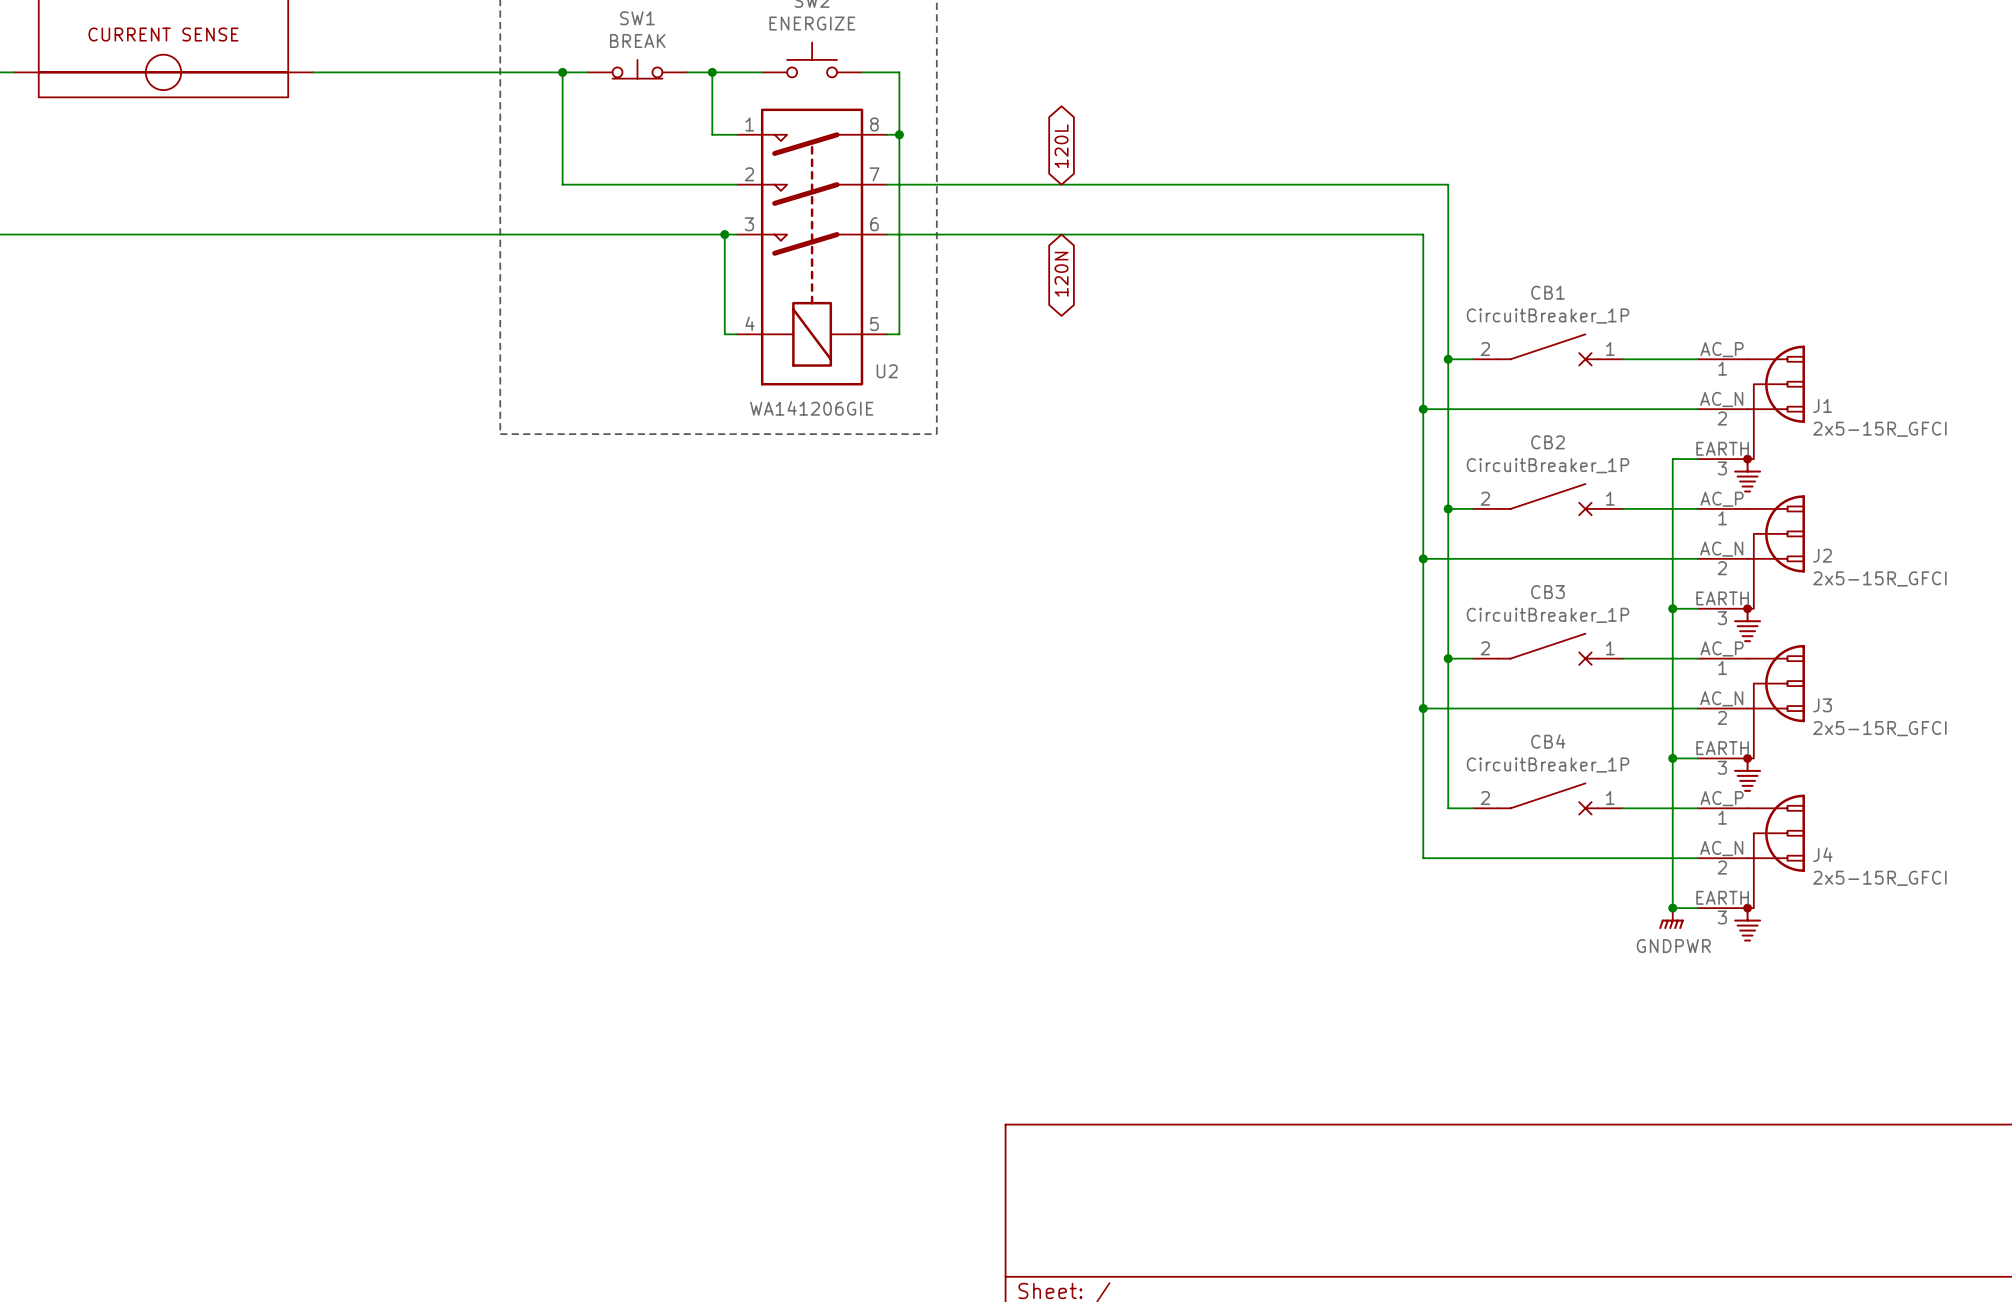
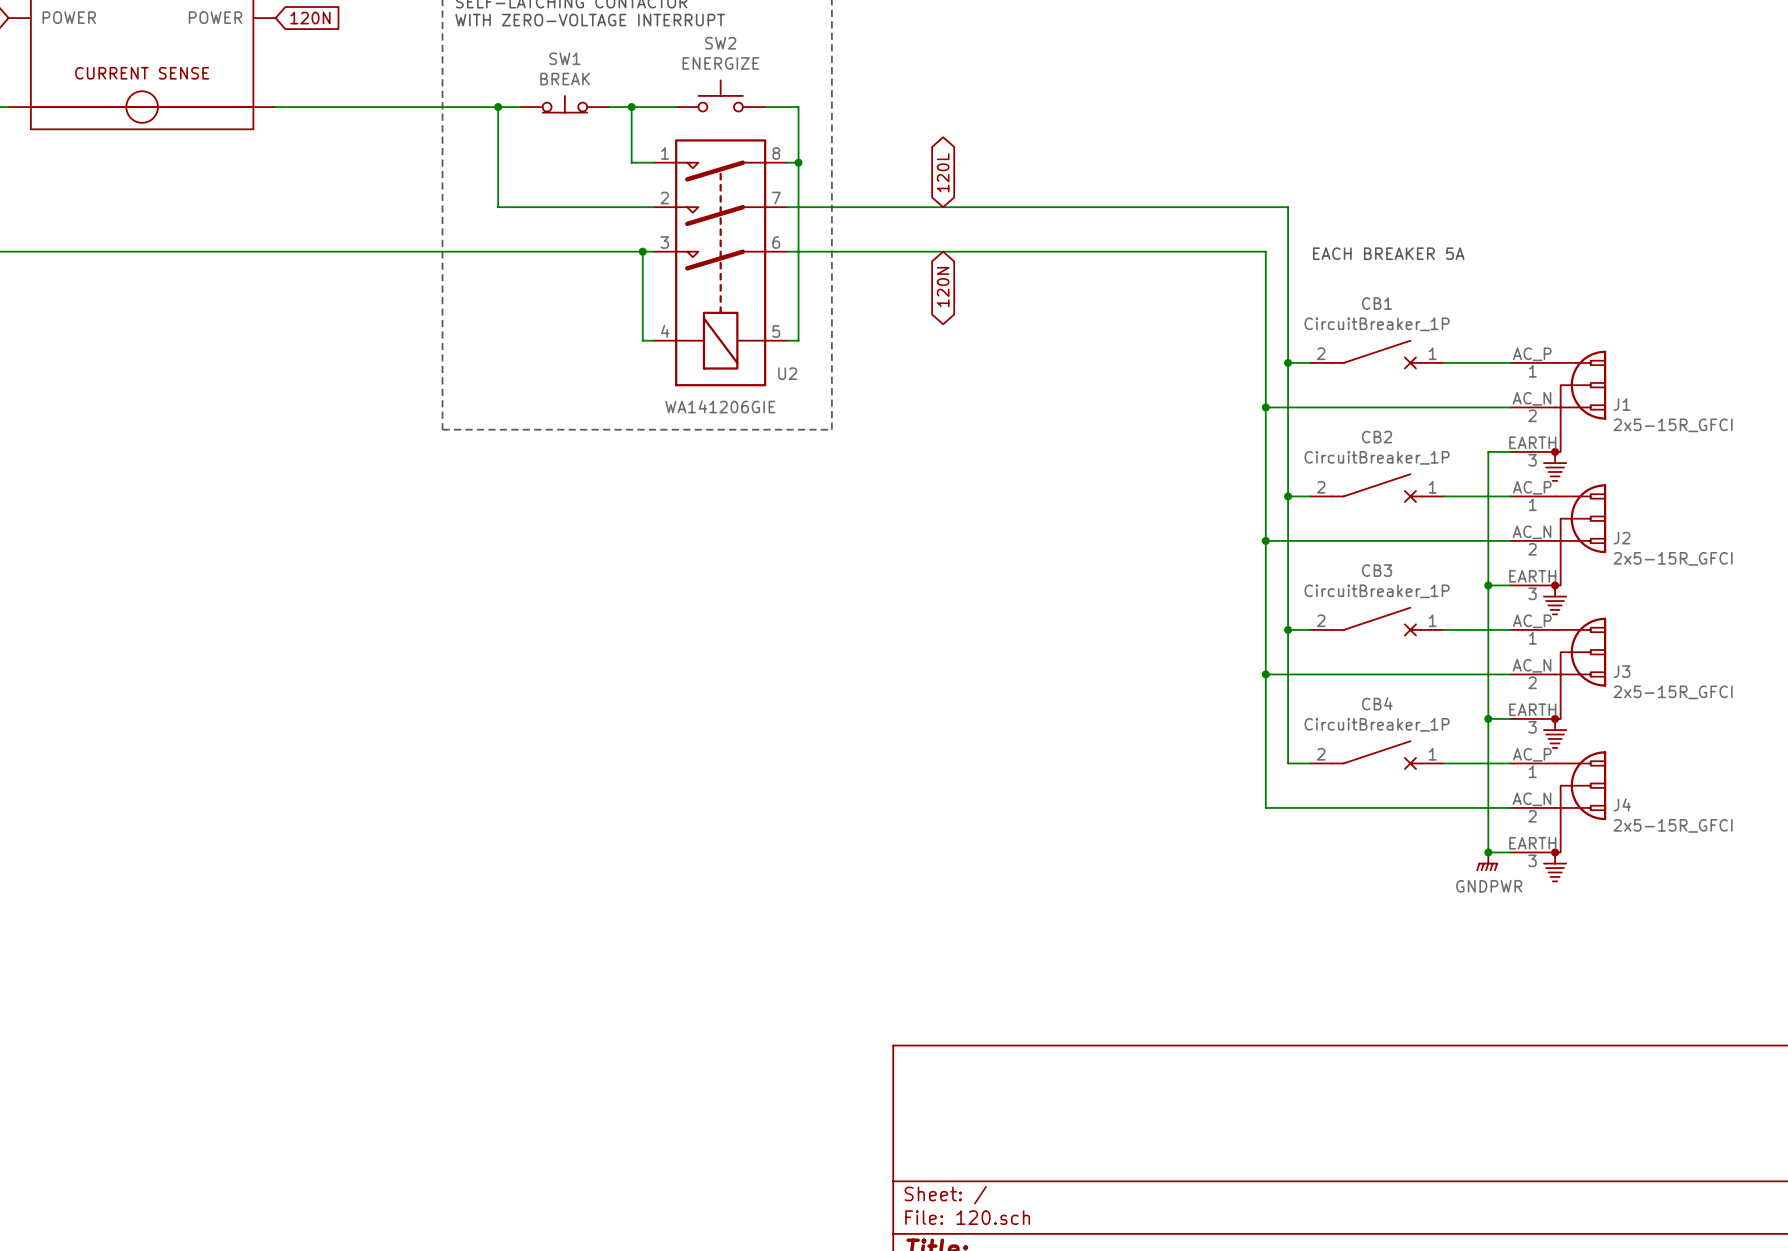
text: none -> EACH BREAKER 5A (1388, 253)

